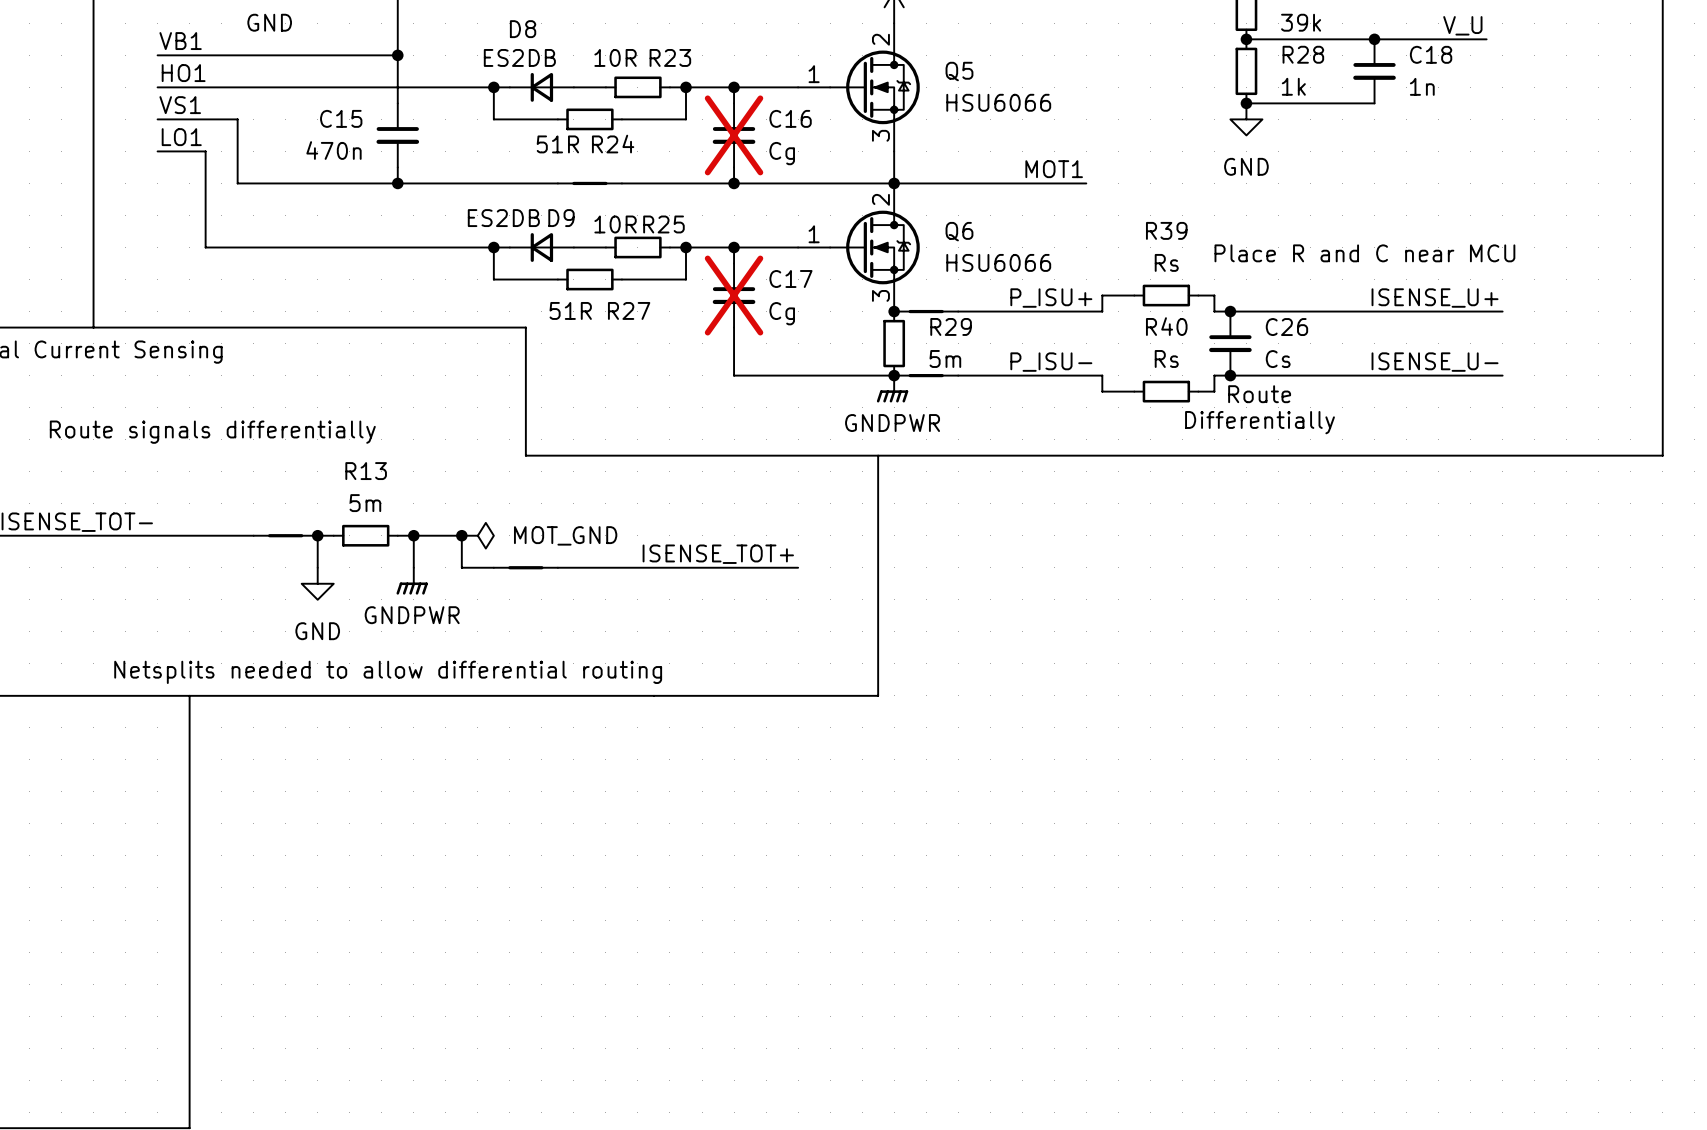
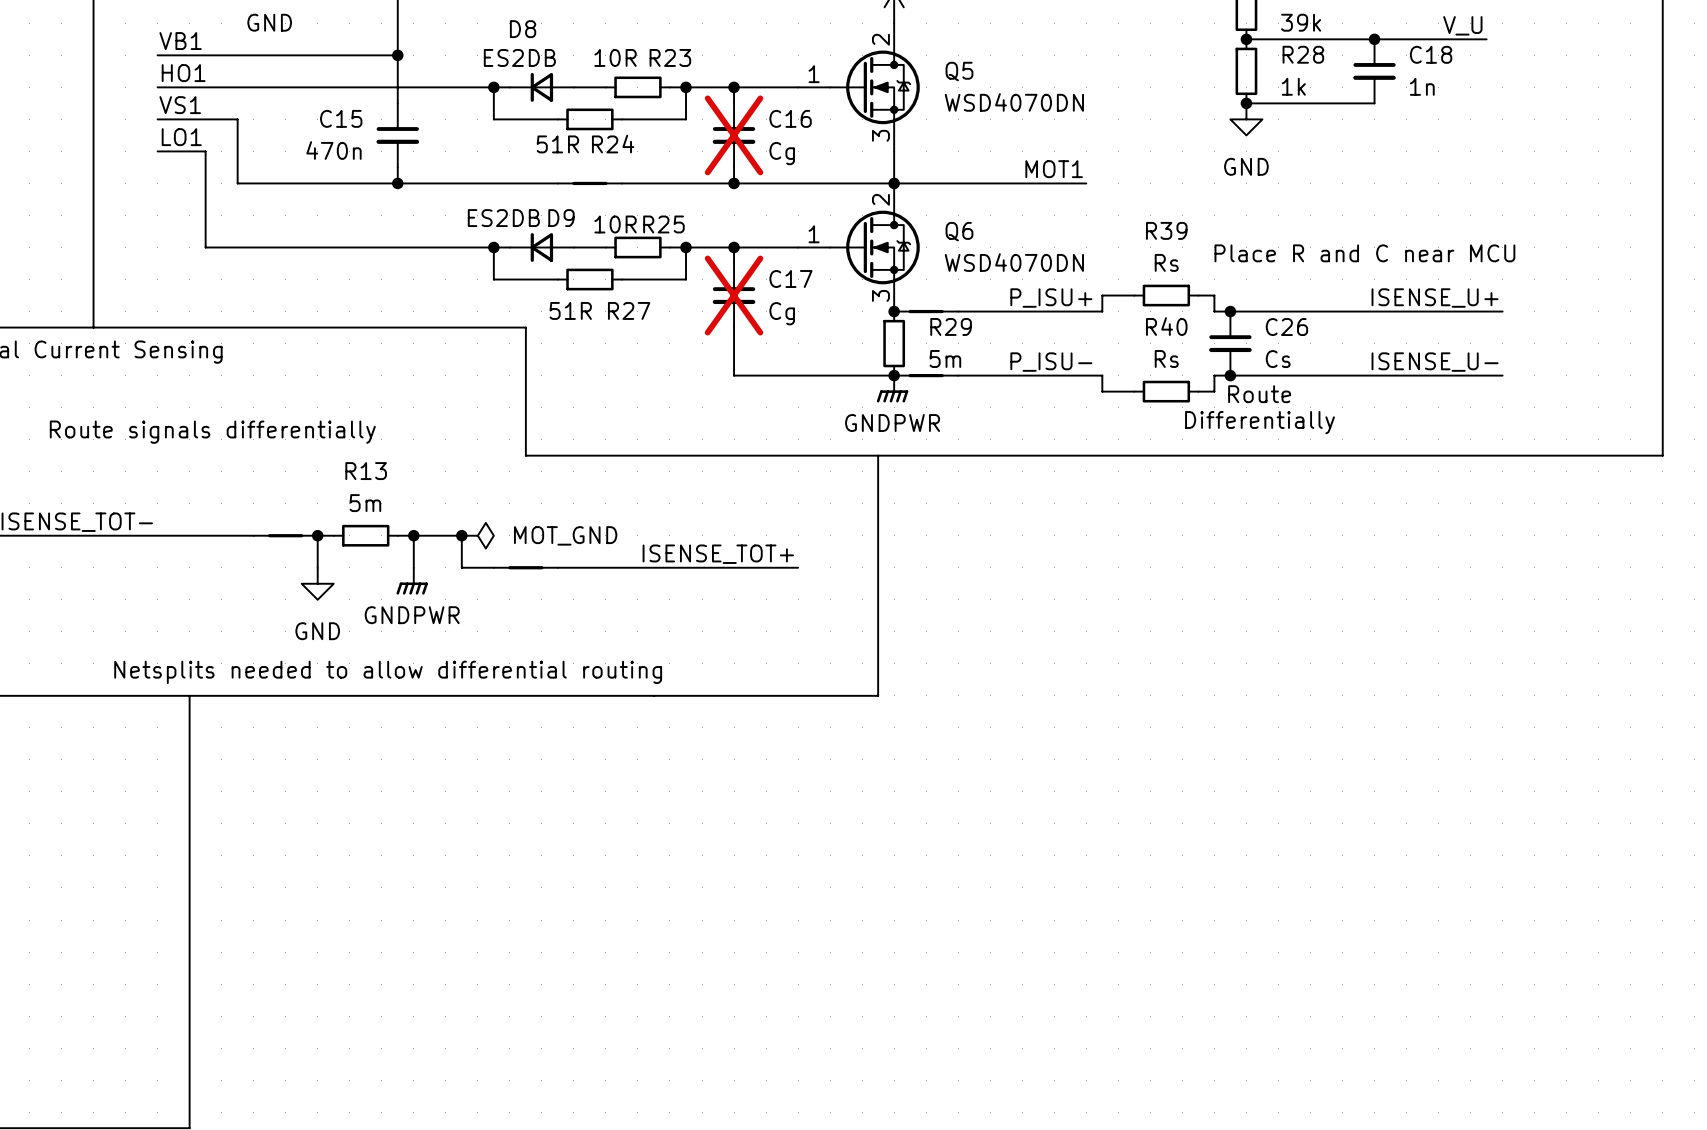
Q5 value: HSU6066 (998, 102) -> WSD4070DN (1014, 102)
Q6 value: HSU6066 (998, 262) -> WSD4070DN (1014, 262)

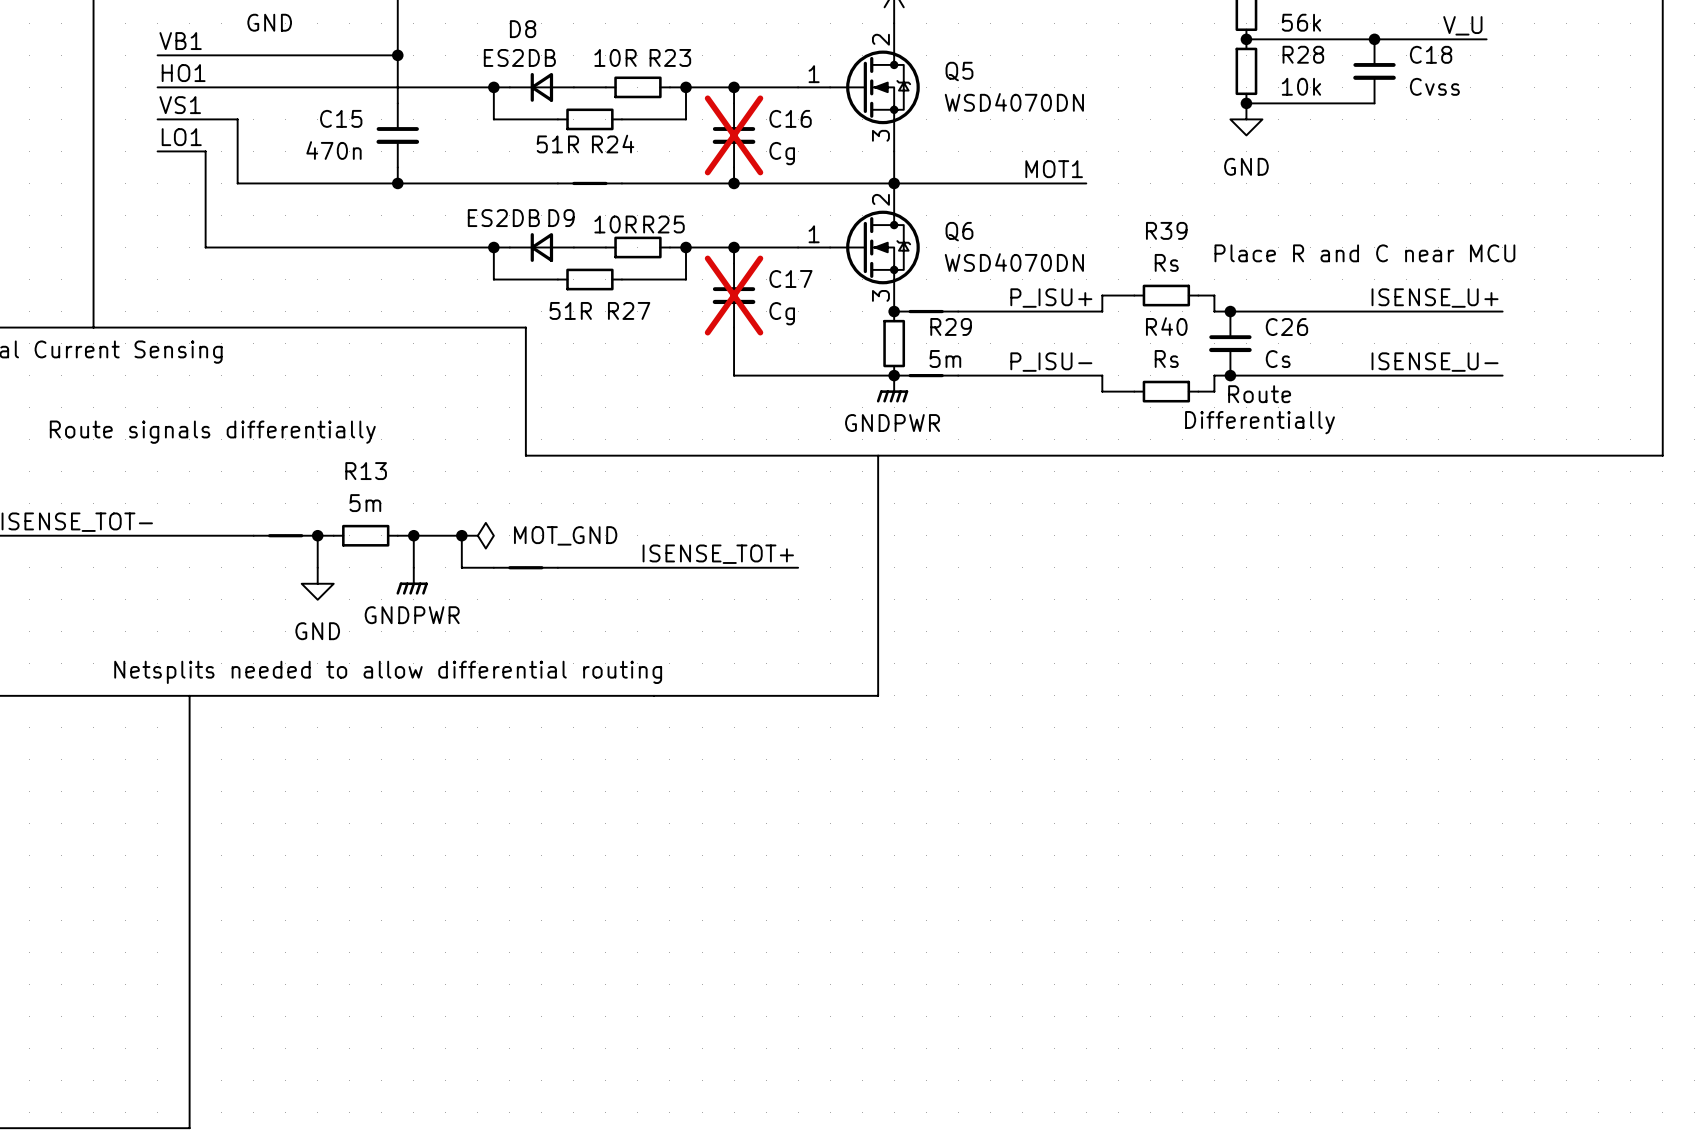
part value: 39k (1301, 22) -> 56k (1301, 22)
R28 value: 1k (1293, 86) -> 10k (1301, 86)
C18 value: 1n (1422, 86) -> Cvss (1434, 86)

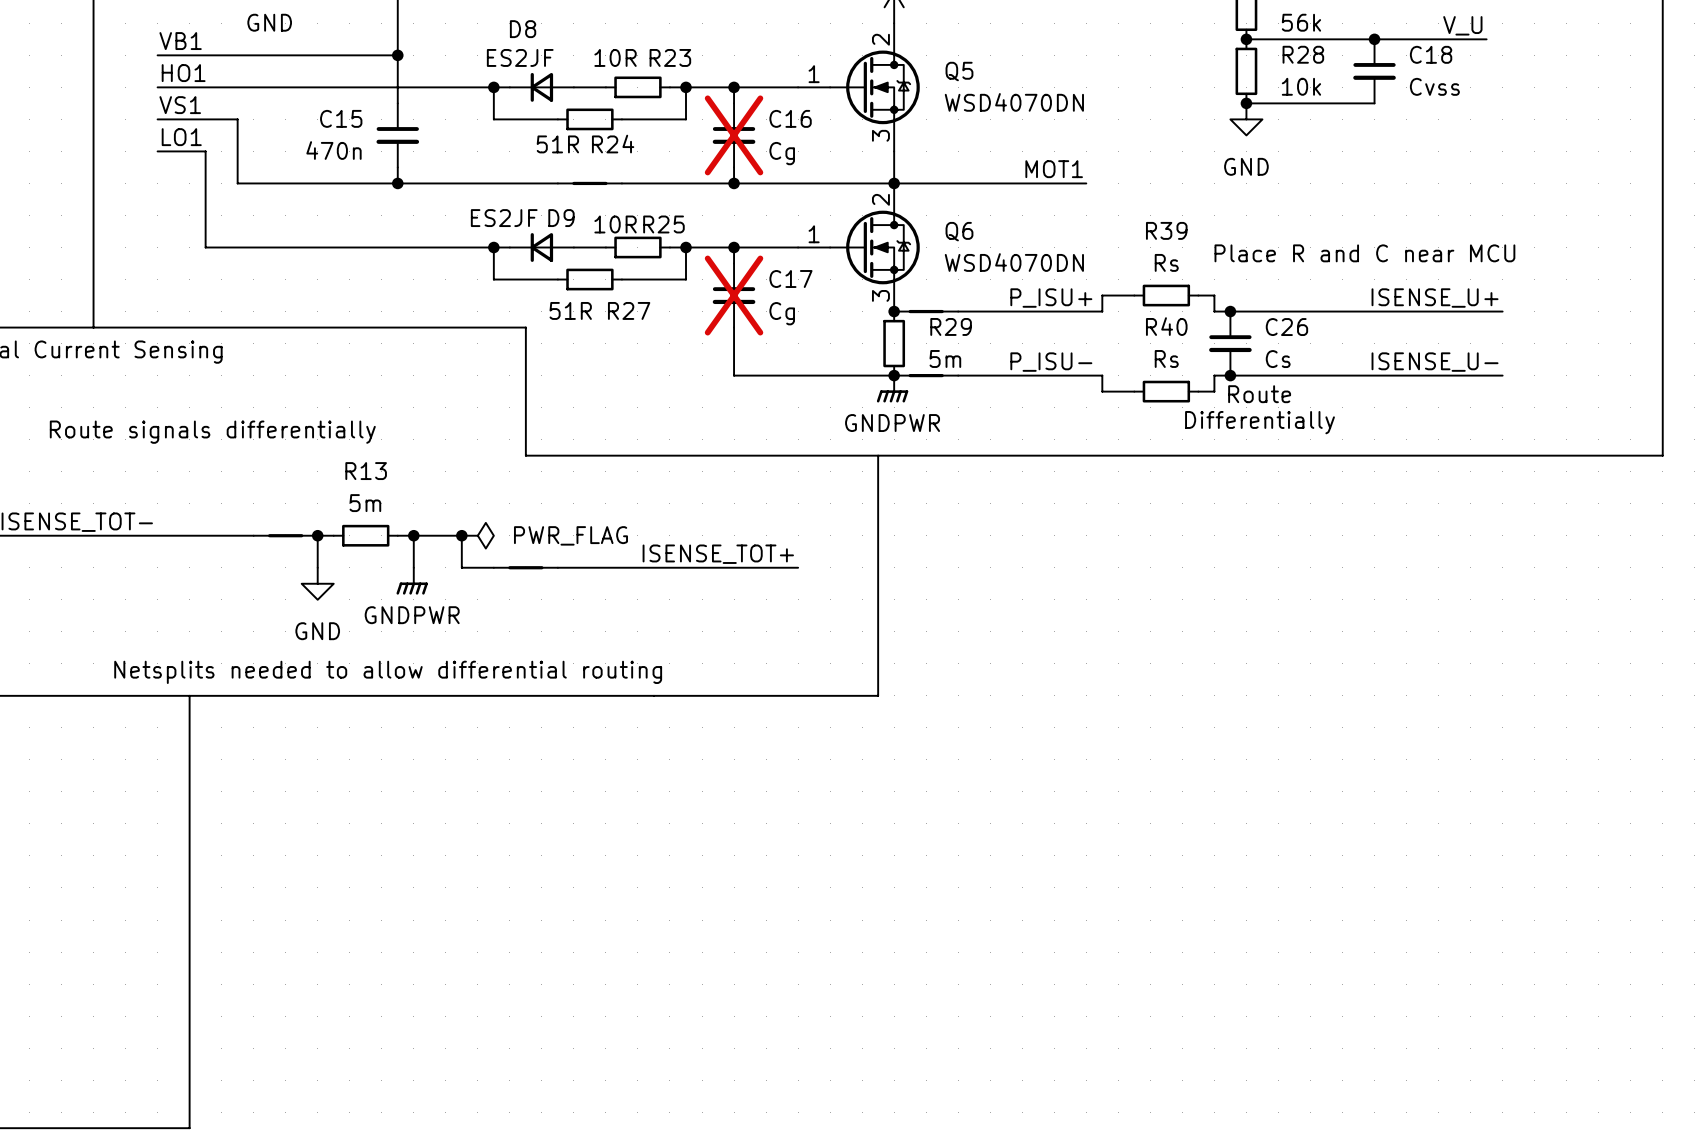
D8 value: ES2DB (519, 57) -> ES2JF (520, 57)
D9 value: ES2DB (503, 218) -> ES2JF (504, 218)
power symbol: MOT_GND (477, 535) -> PWR_FLAG (477, 535)

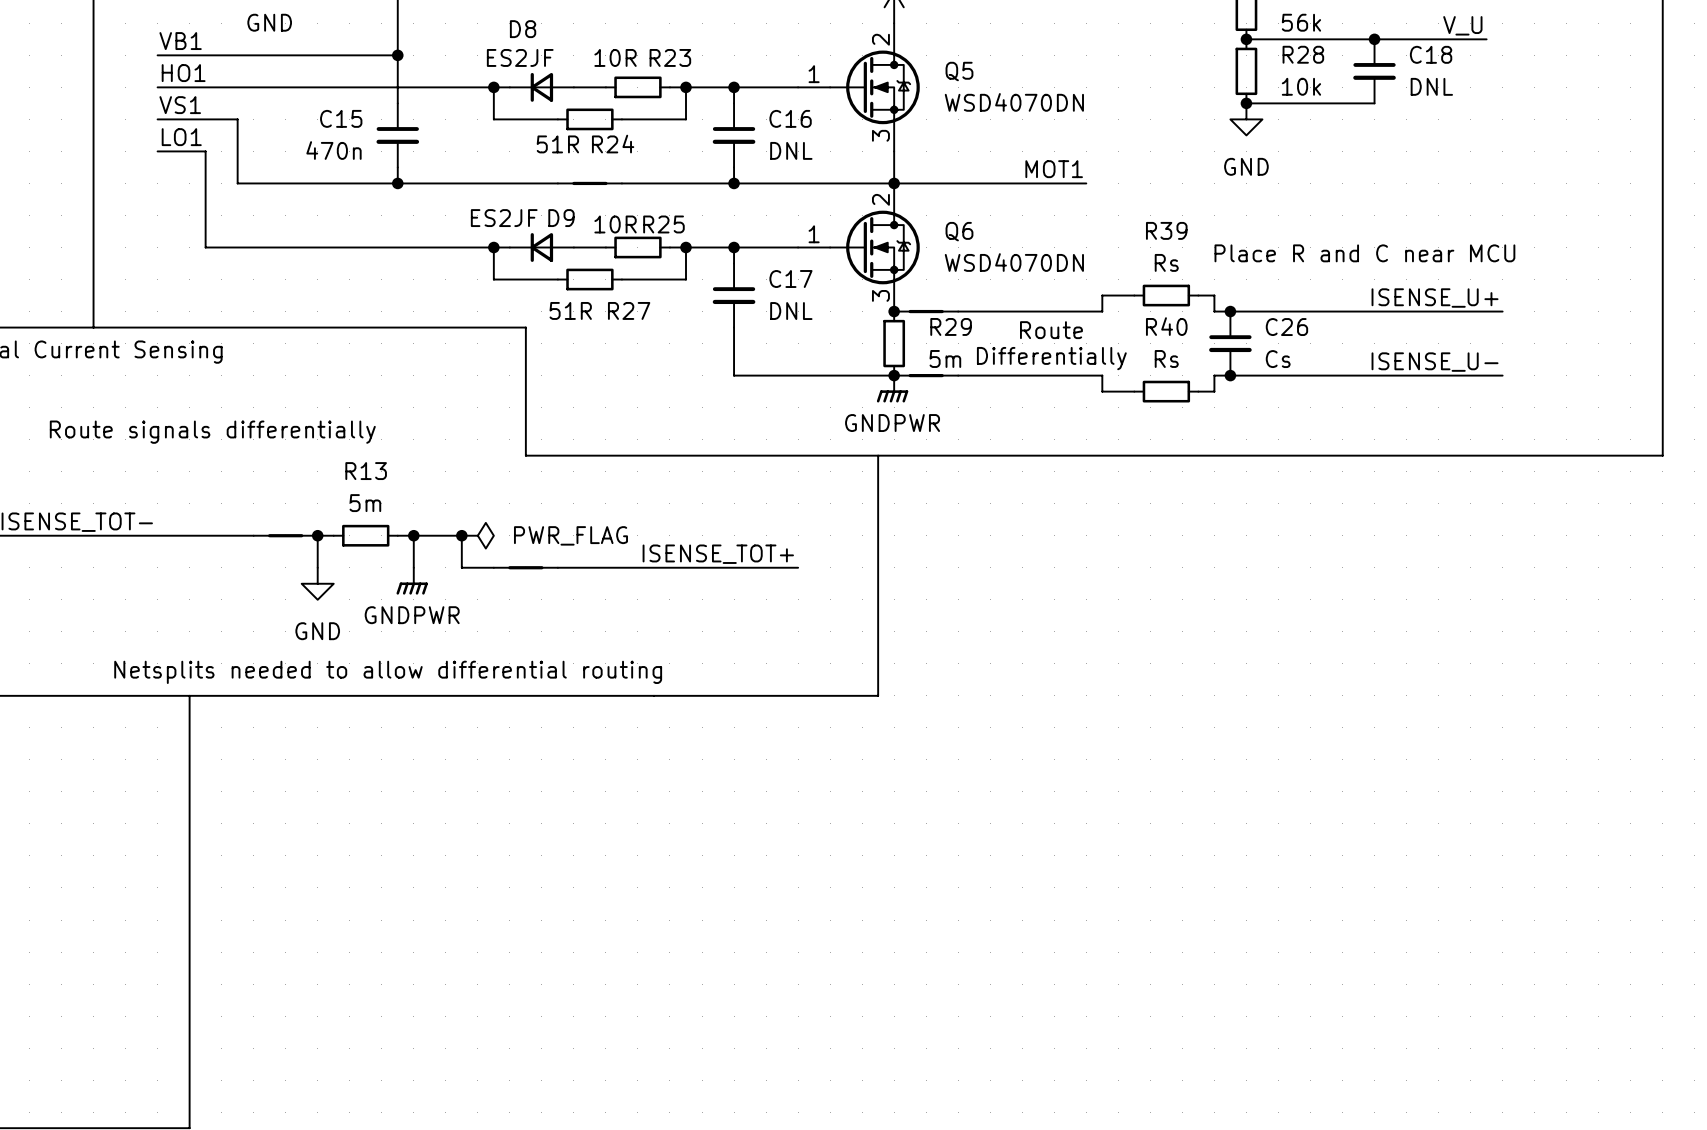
C18 value: Cvss (1434, 86) -> DNL (1431, 86)
C16 do-not-place cross: (734, 135) -> none
C16 value: Cg (782, 153) -> DNL (791, 150)
C17 do-not-place cross: (734, 295) -> none
label: P_ISU+ (1051, 298) -> none
C17 value: Cg (782, 313) -> DNL (791, 311)
label: P_ISU- (1051, 362) -> none
text position: Route (1259, 394) -> Route (1051, 330)
text position: Differentially (1260, 422) -> Differentially (1051, 358)

